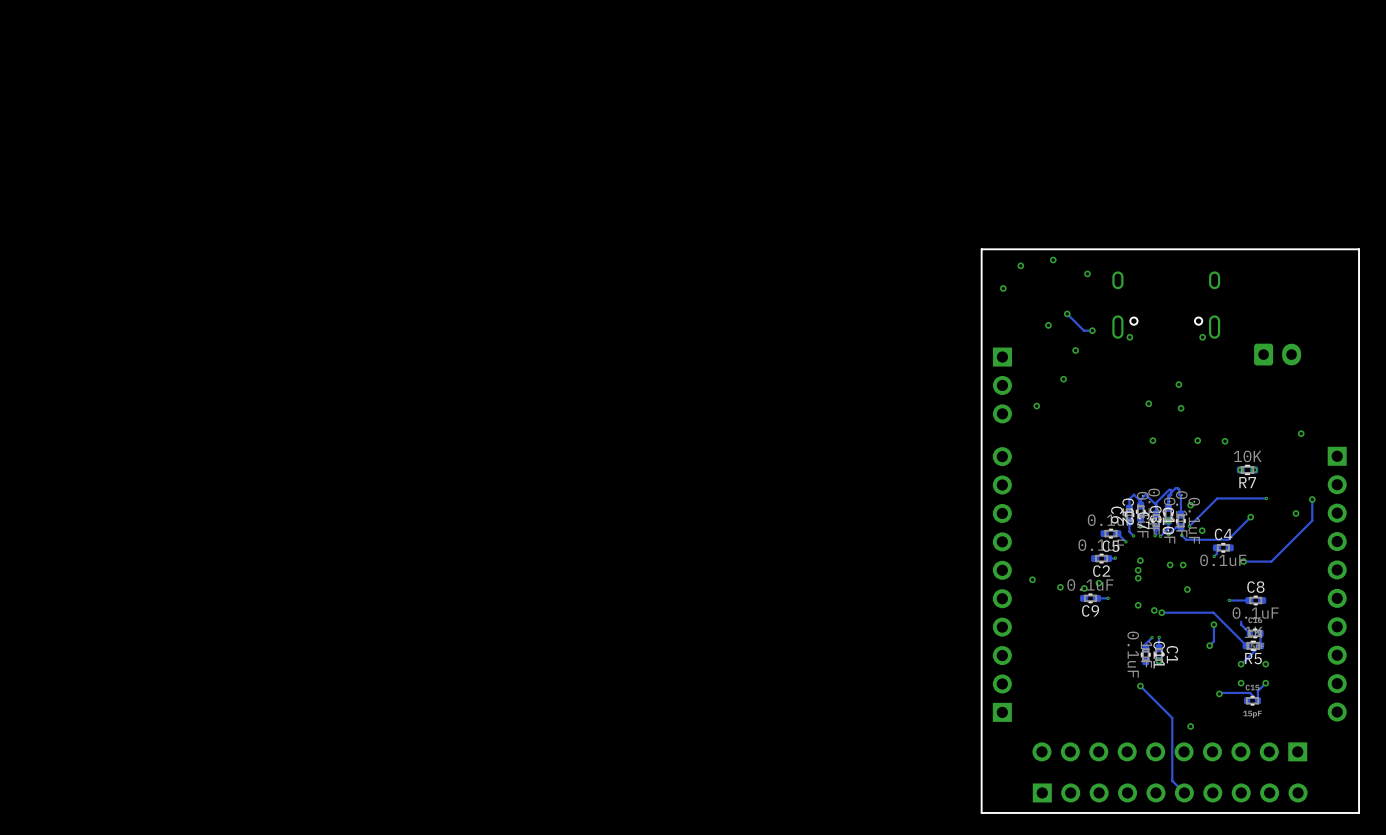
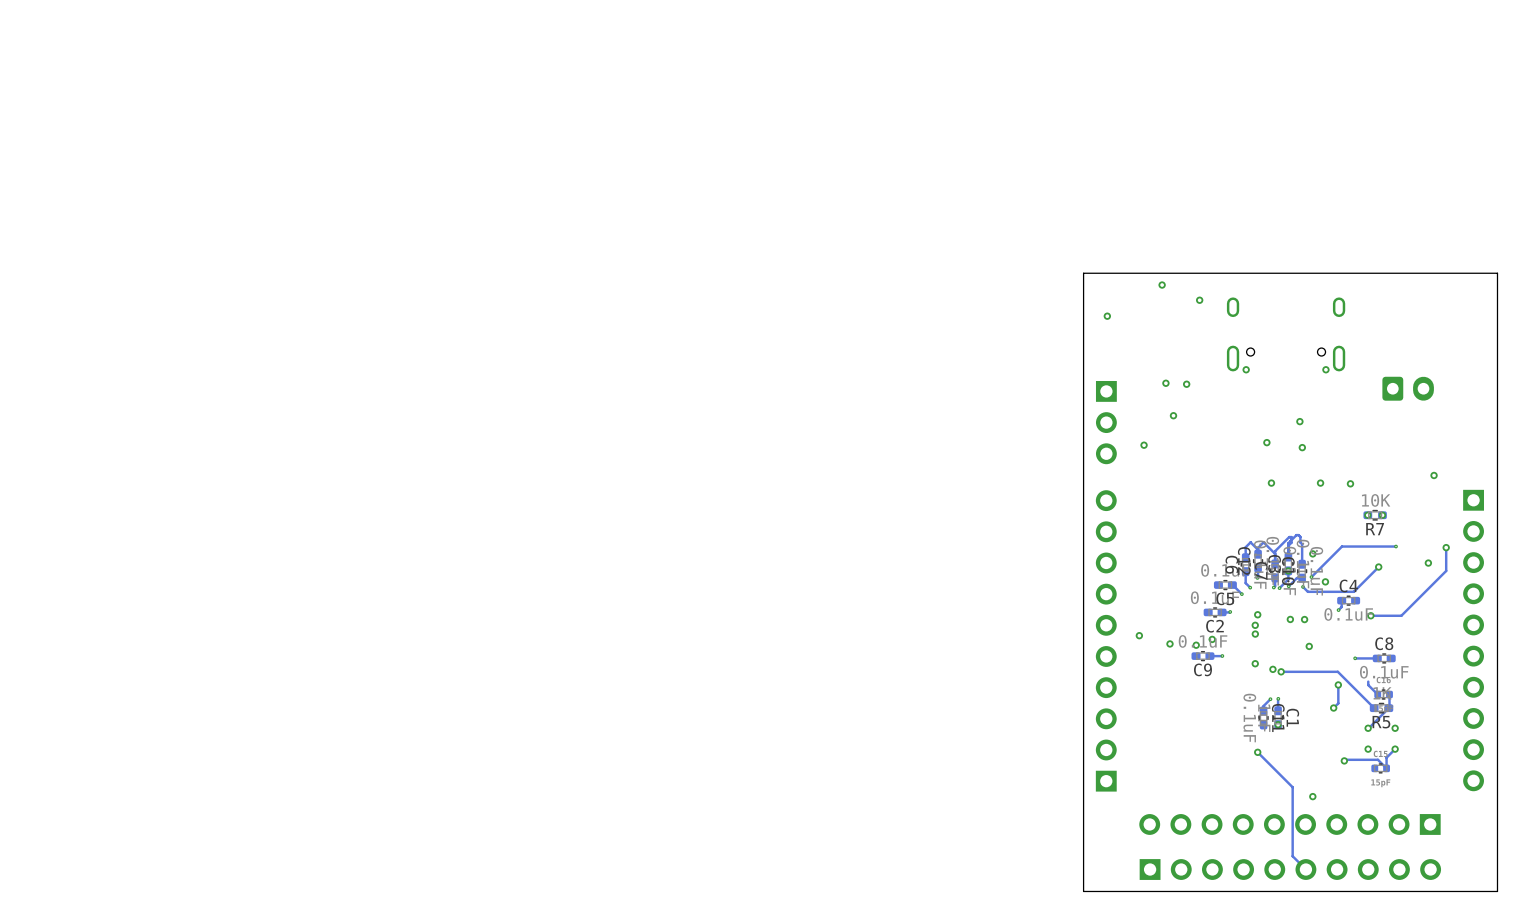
via: (1020, 265) -> none
track: (1067, 313) (1083, 330) (1092, 330) -> none
via: (1067, 313) -> none
via: (1048, 325) -> none
via: (1092, 330) -> none
via: none -> (1165, 383)

